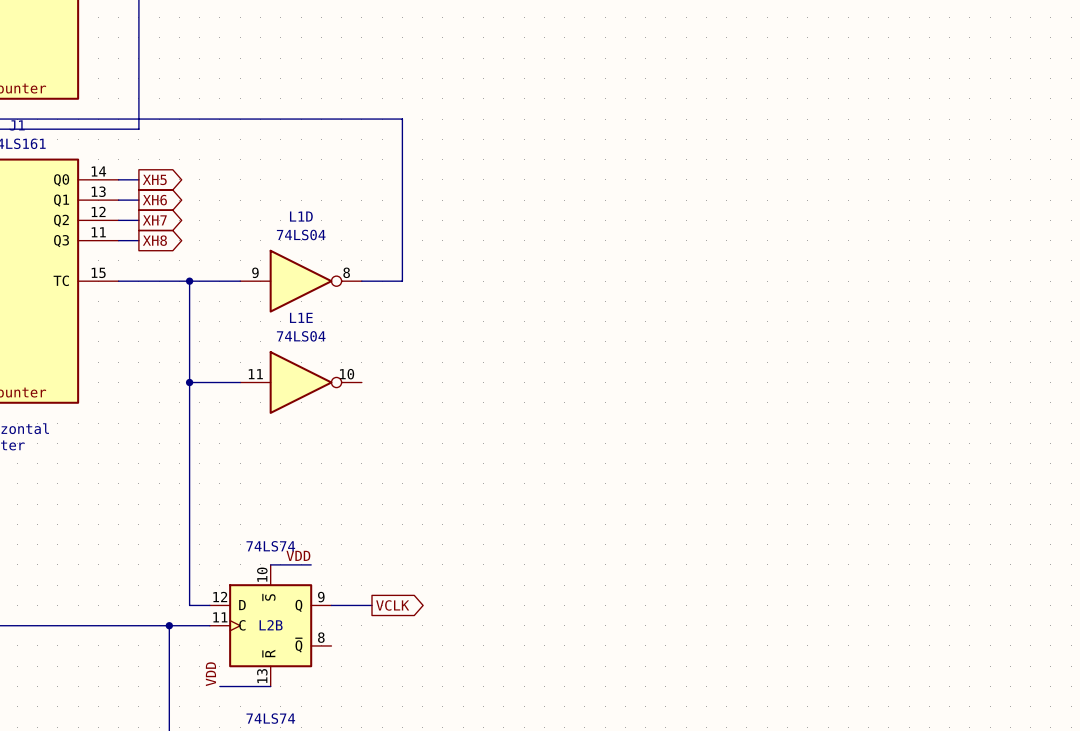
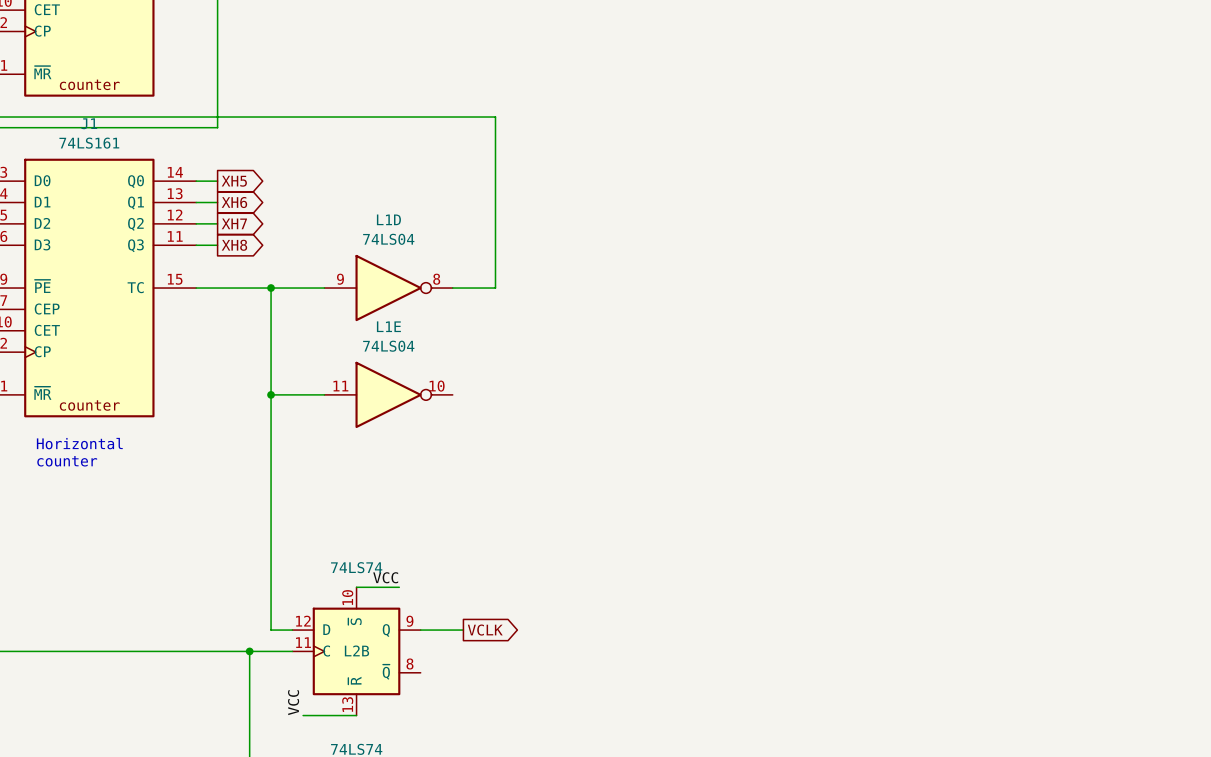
label: VDD (298, 555) -> VCC (385, 577)
label: VDD (210, 674) -> VCC (293, 702)

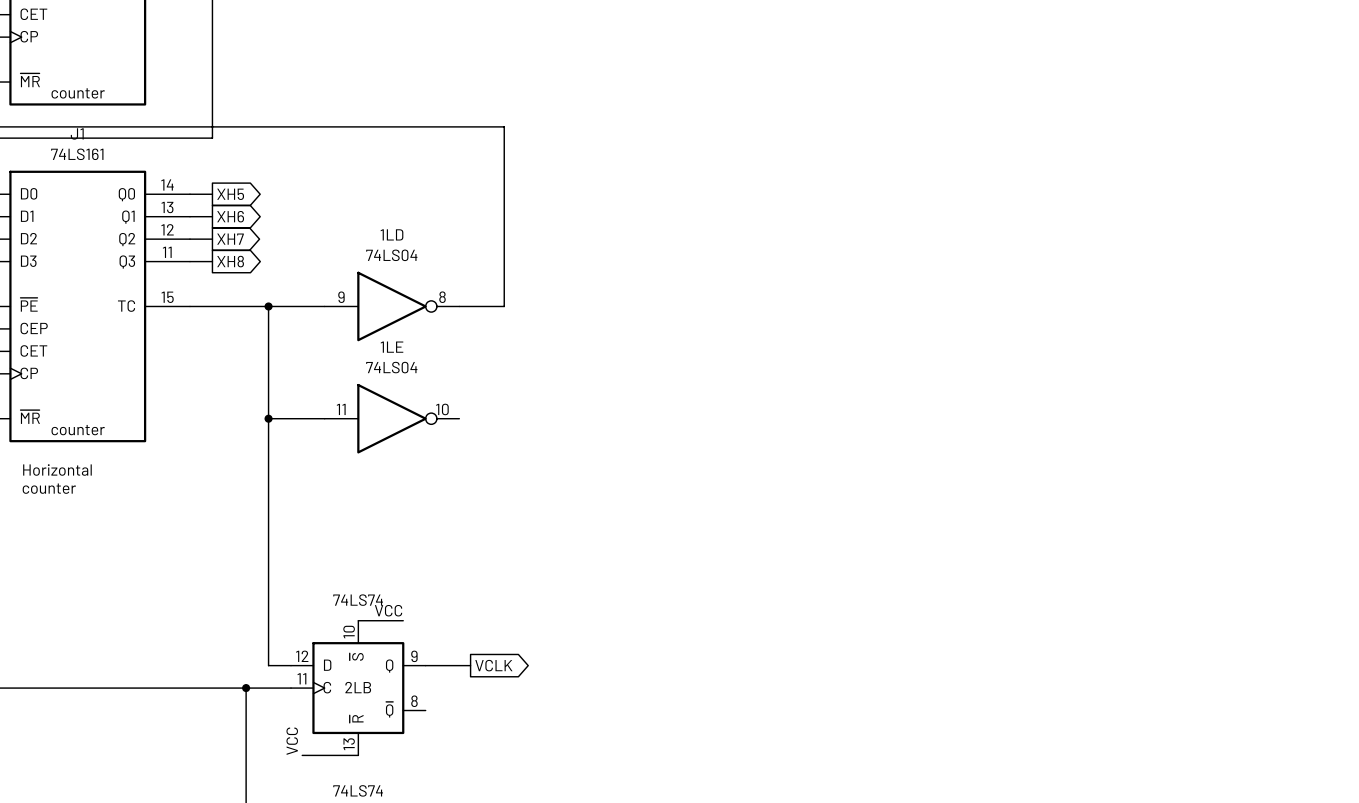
L1D name: L1D (388, 219) -> 1LD (391, 234)
L1E name: L1E (388, 326) -> 1LE (392, 347)
L2B name: L2B (356, 650) -> 2LB (358, 687)

